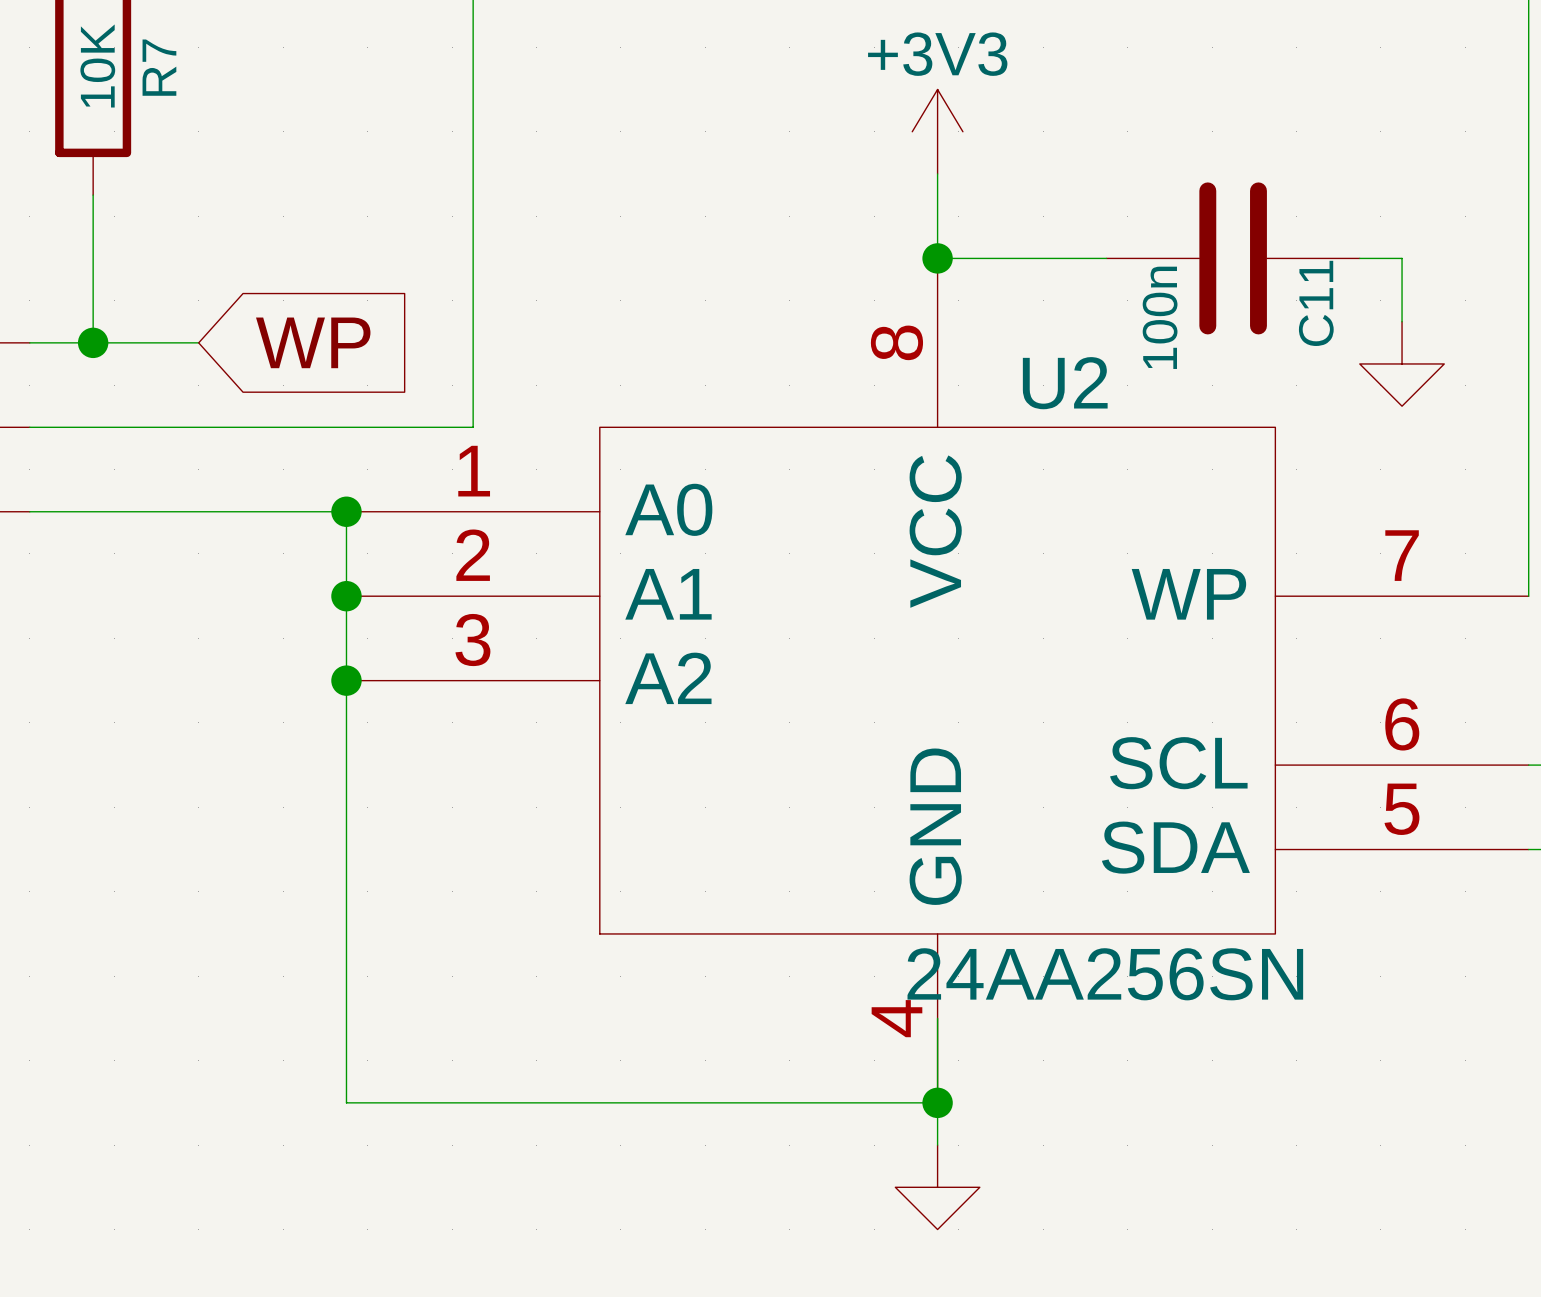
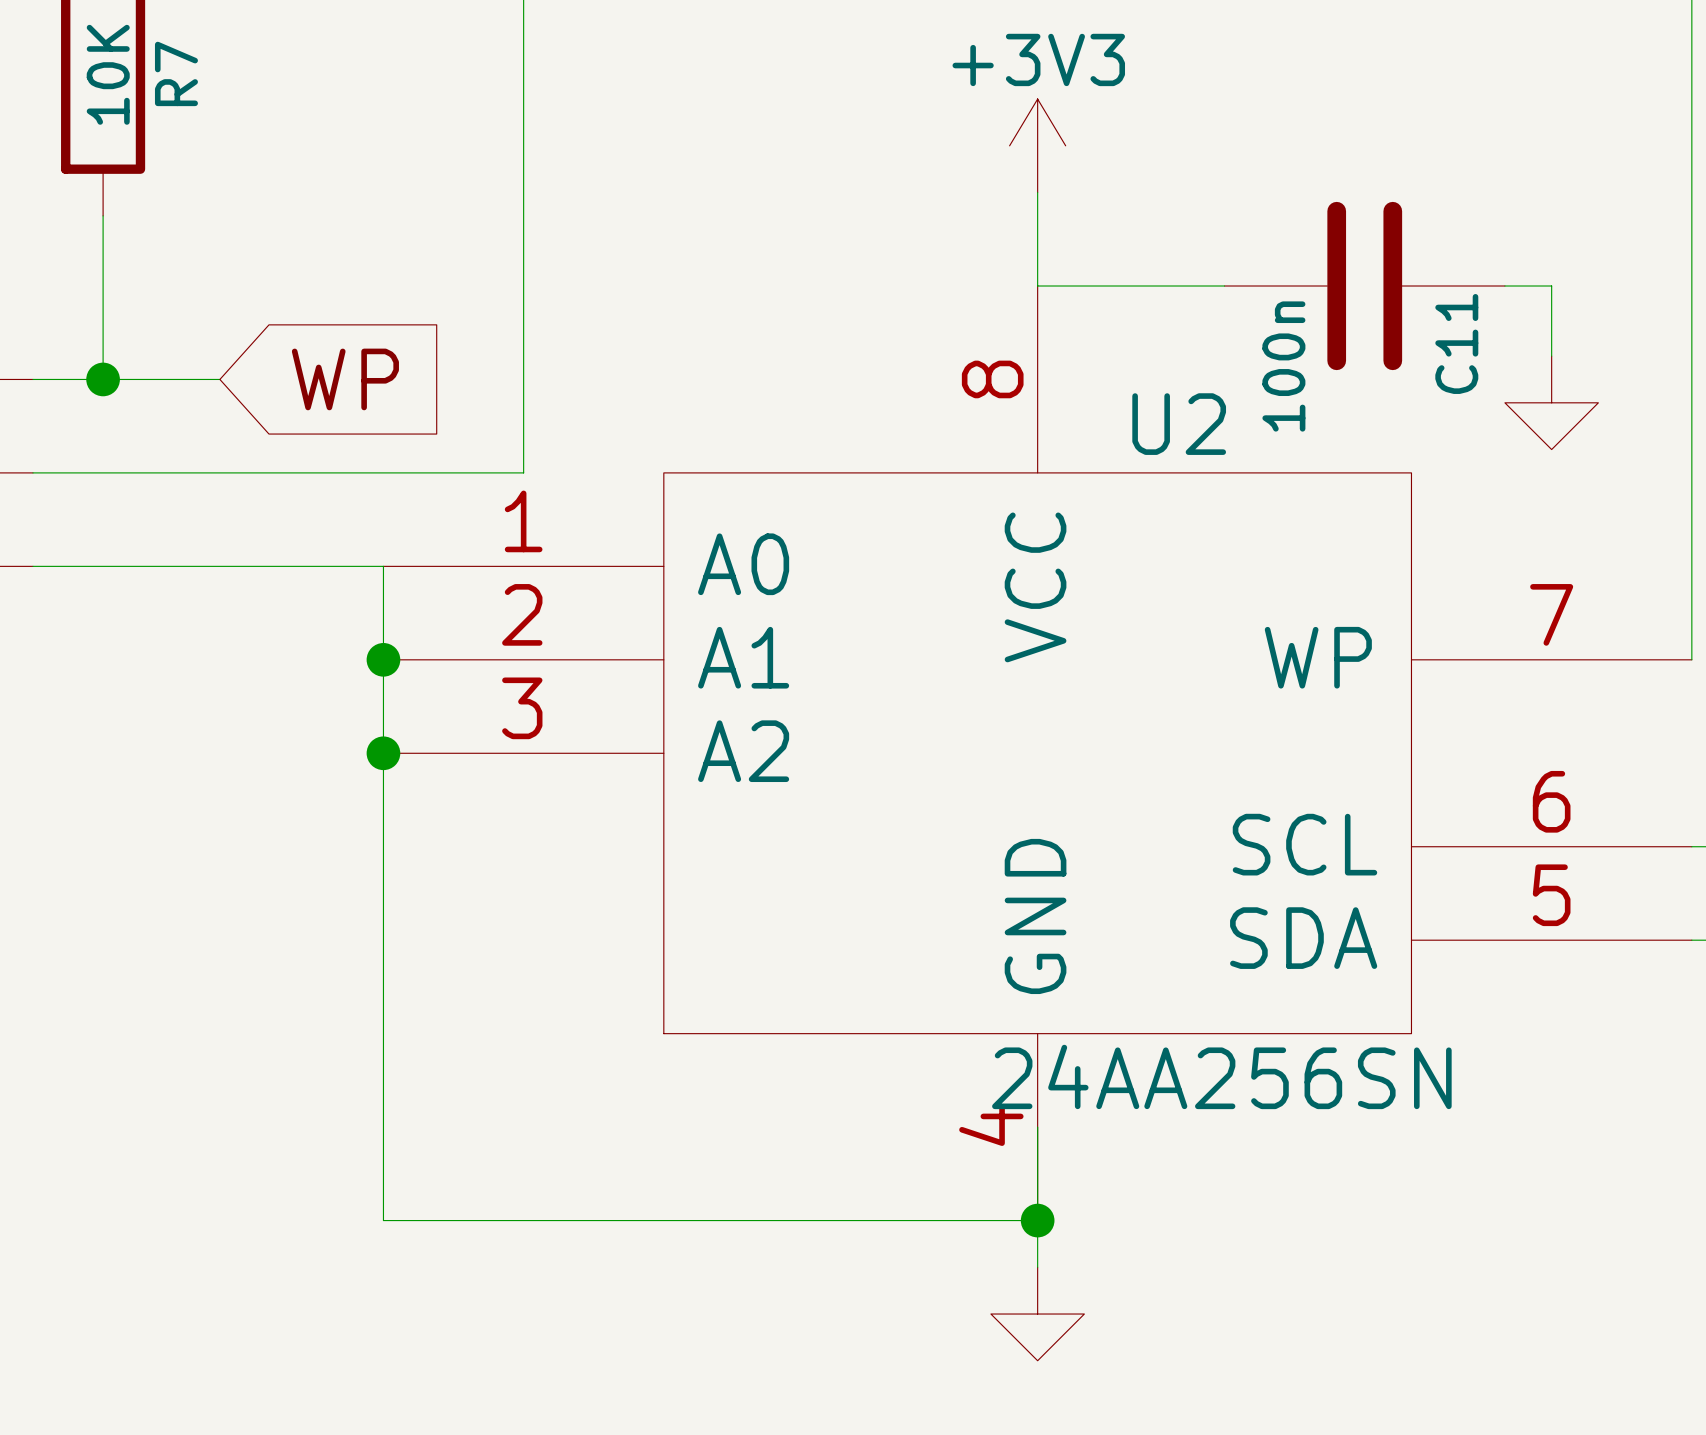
junction: (937, 258) -> none
junction: (346, 511) -> none

